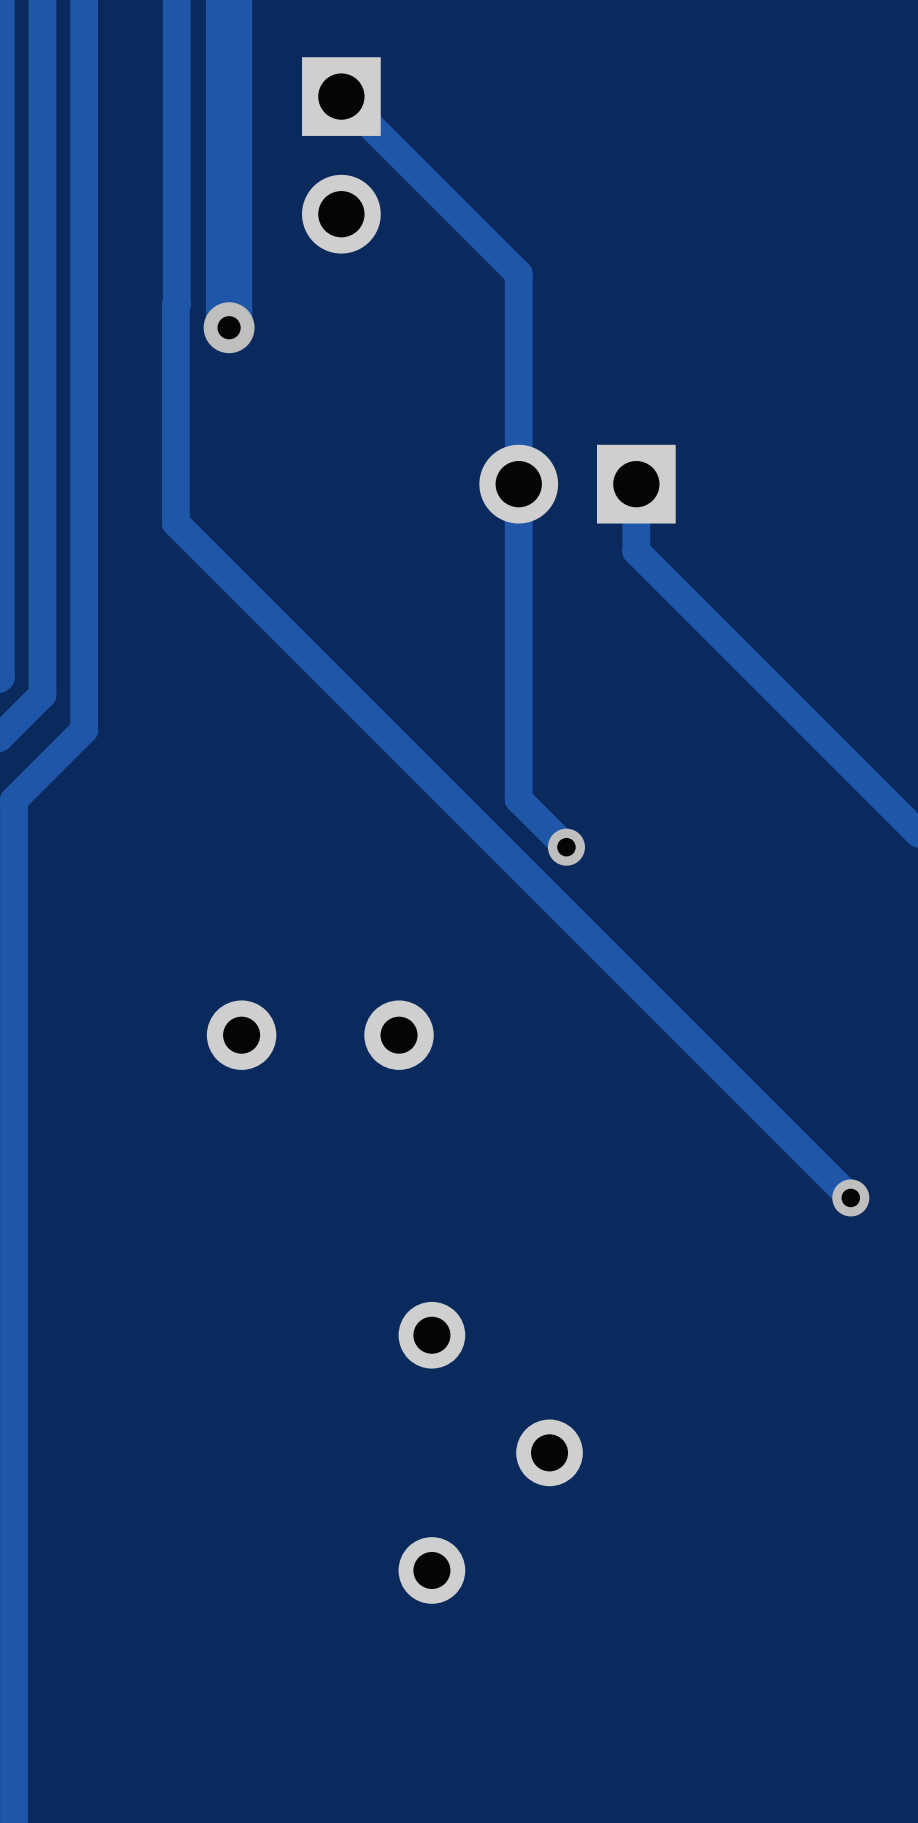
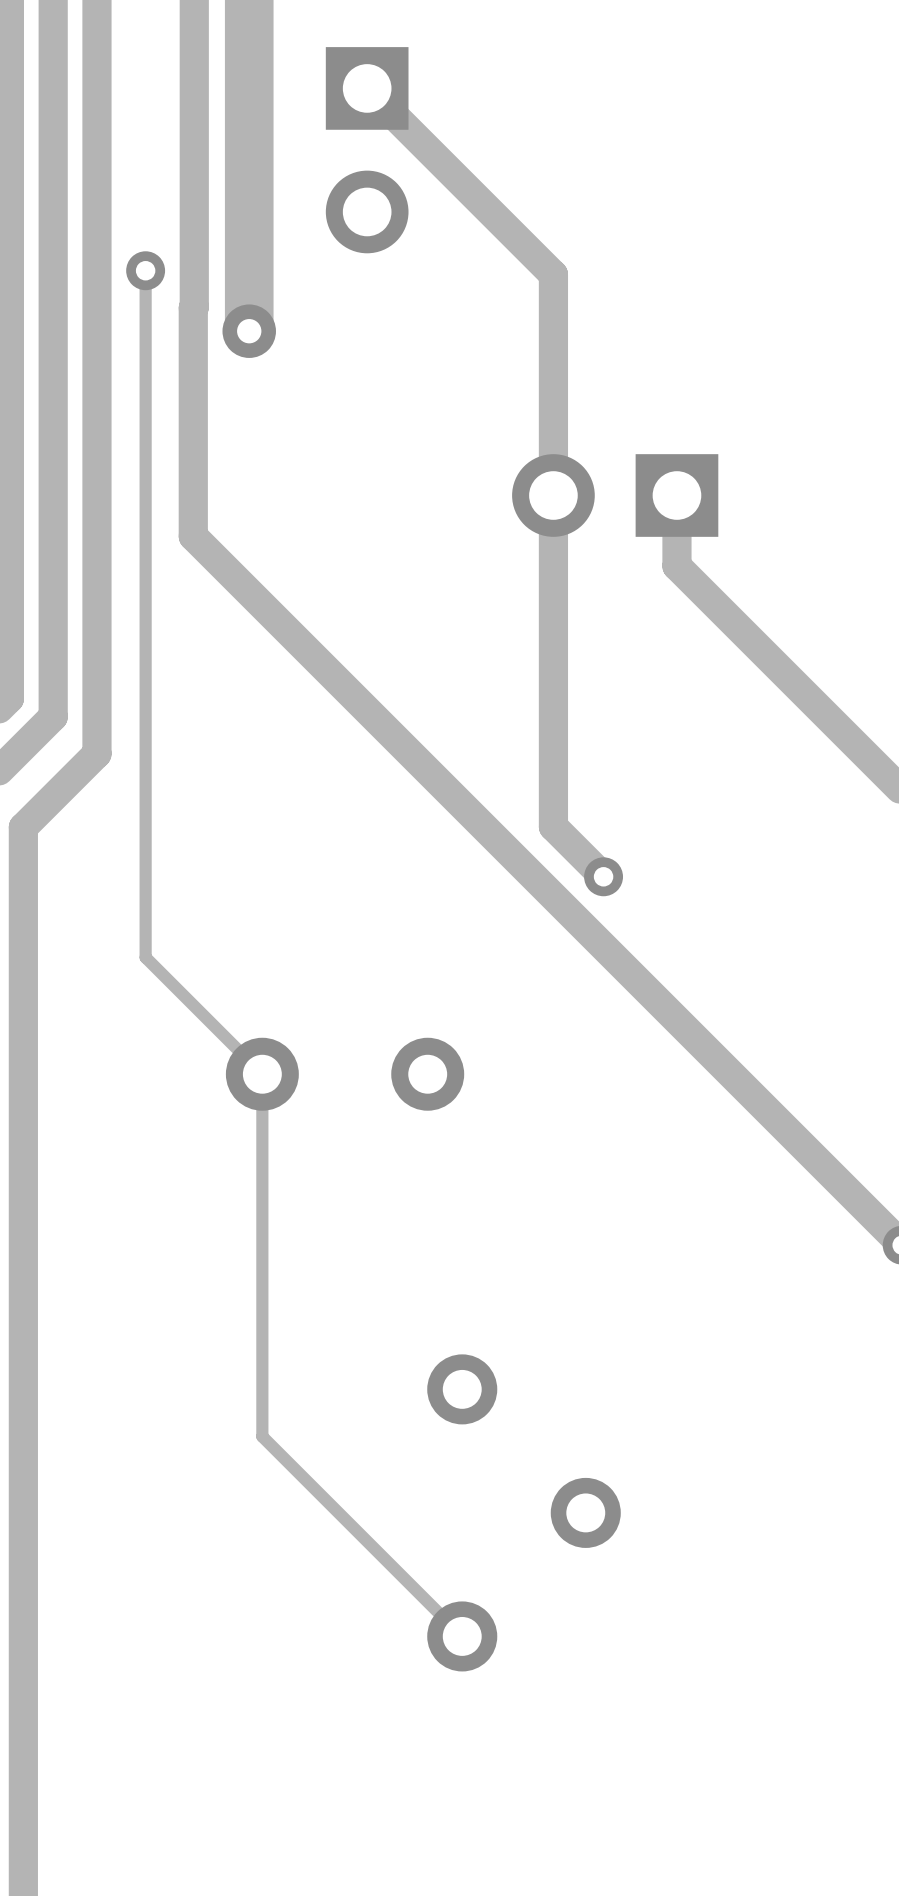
track: none -> (145, 270) (145, 957) (262, 1074) (262, 1436) (462, 1636)
via: none -> (145, 270)

